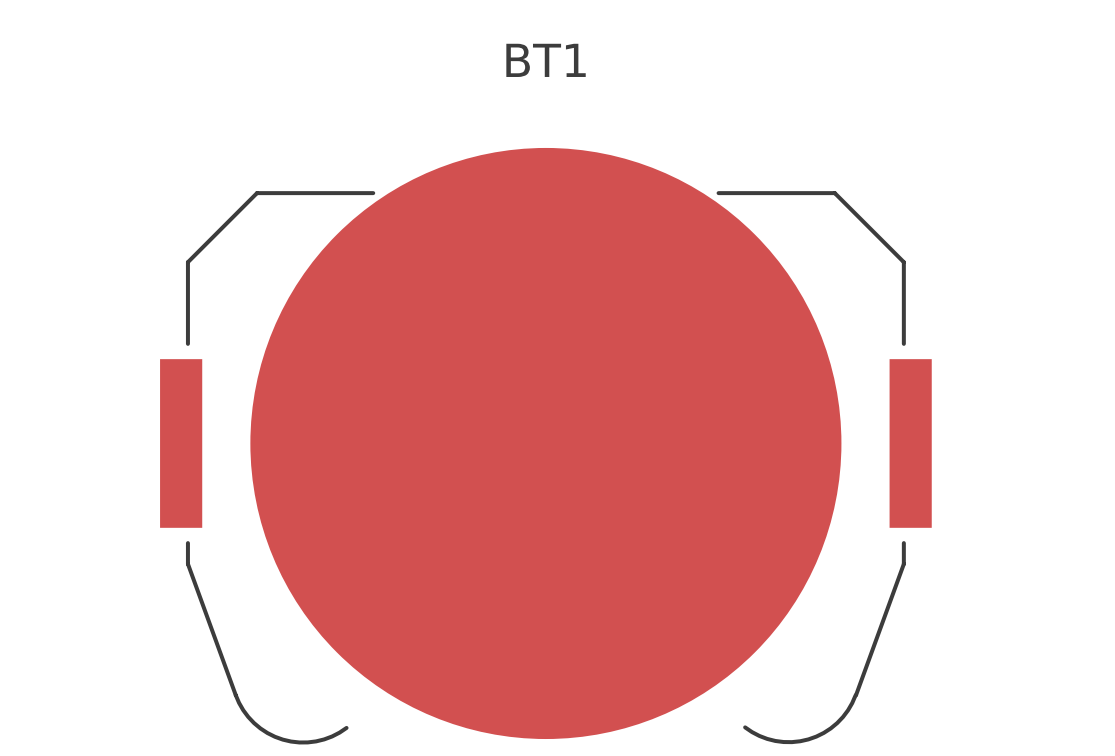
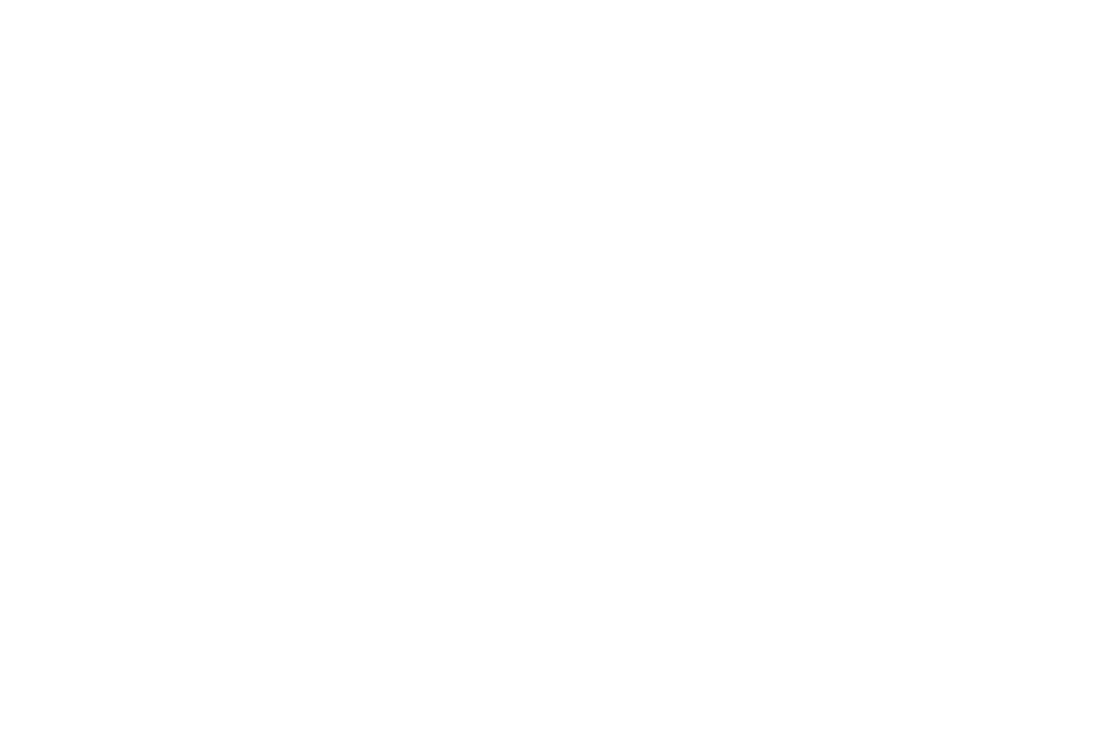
BT1: (545, 446) -> none

